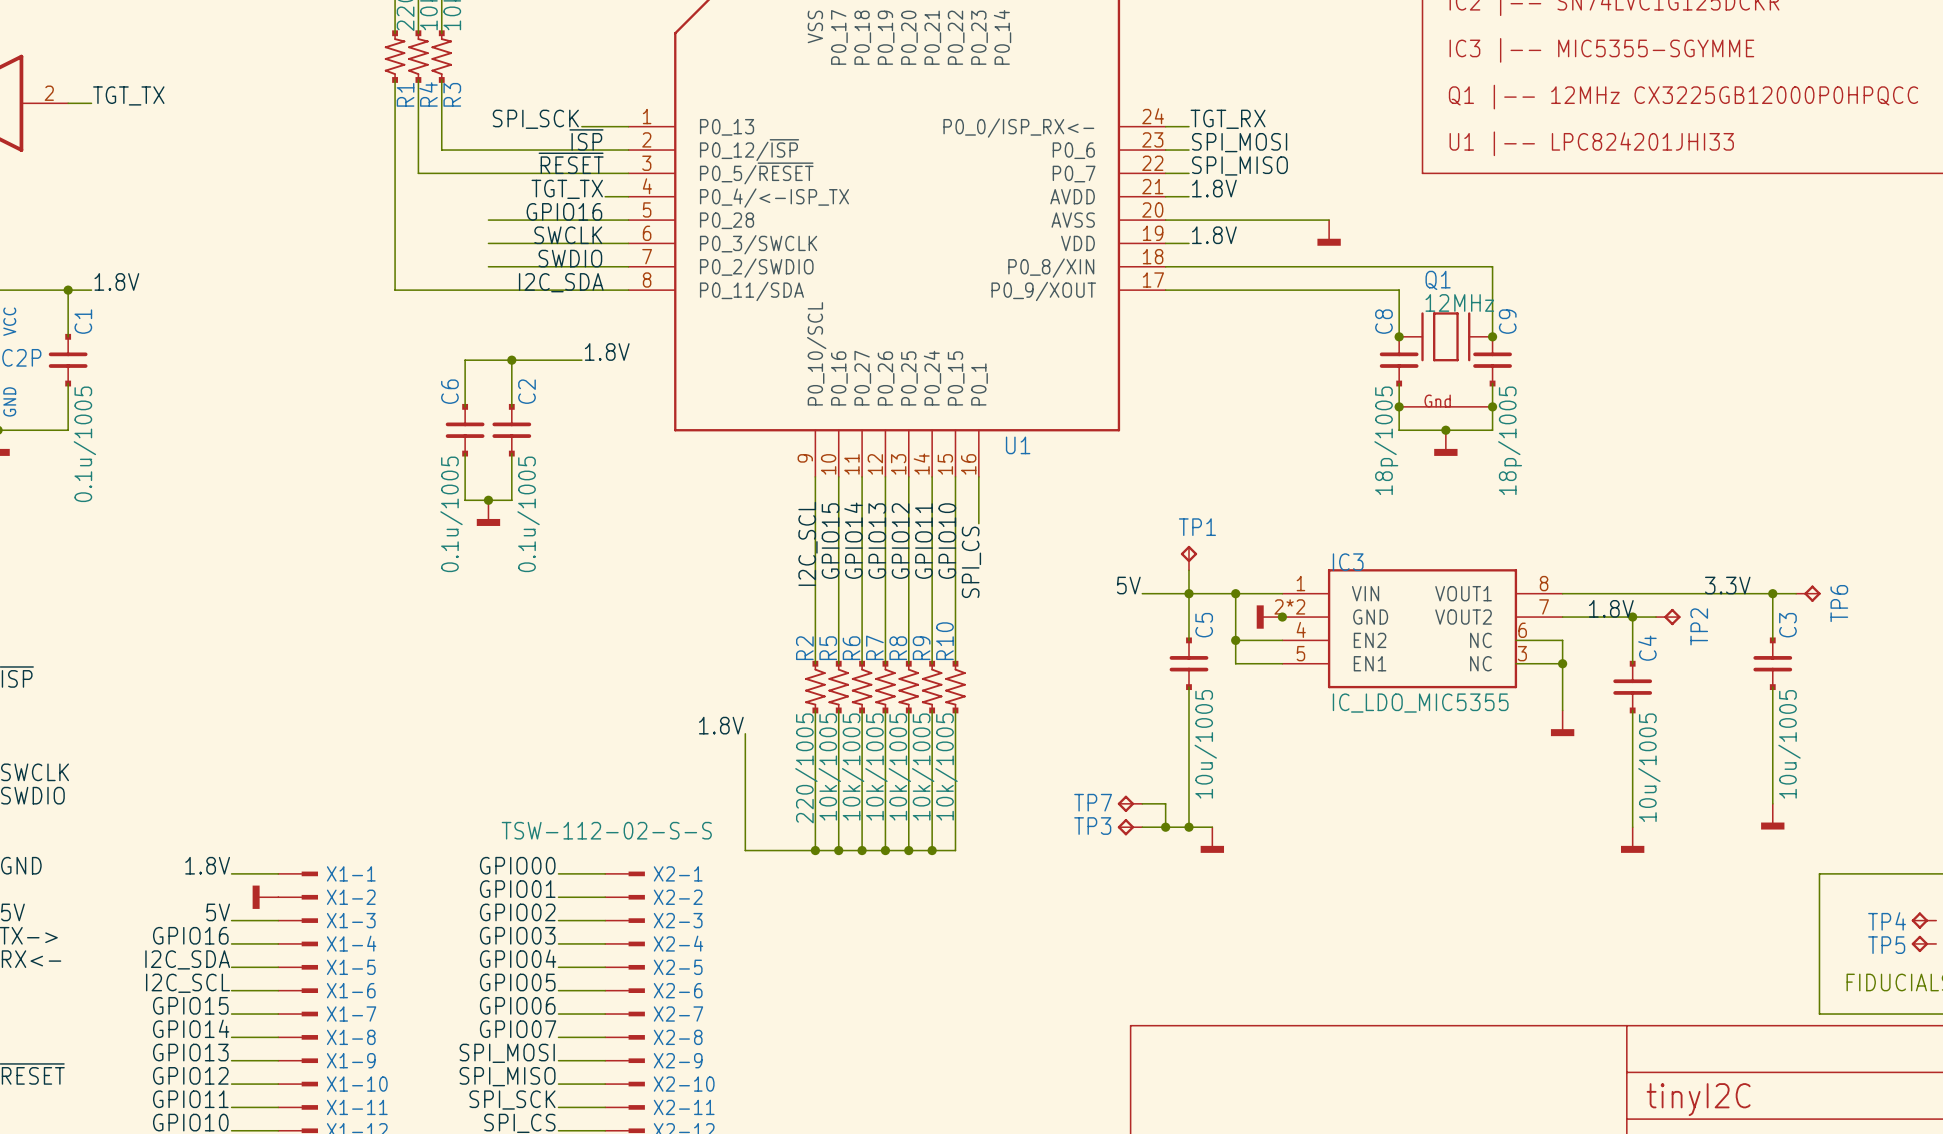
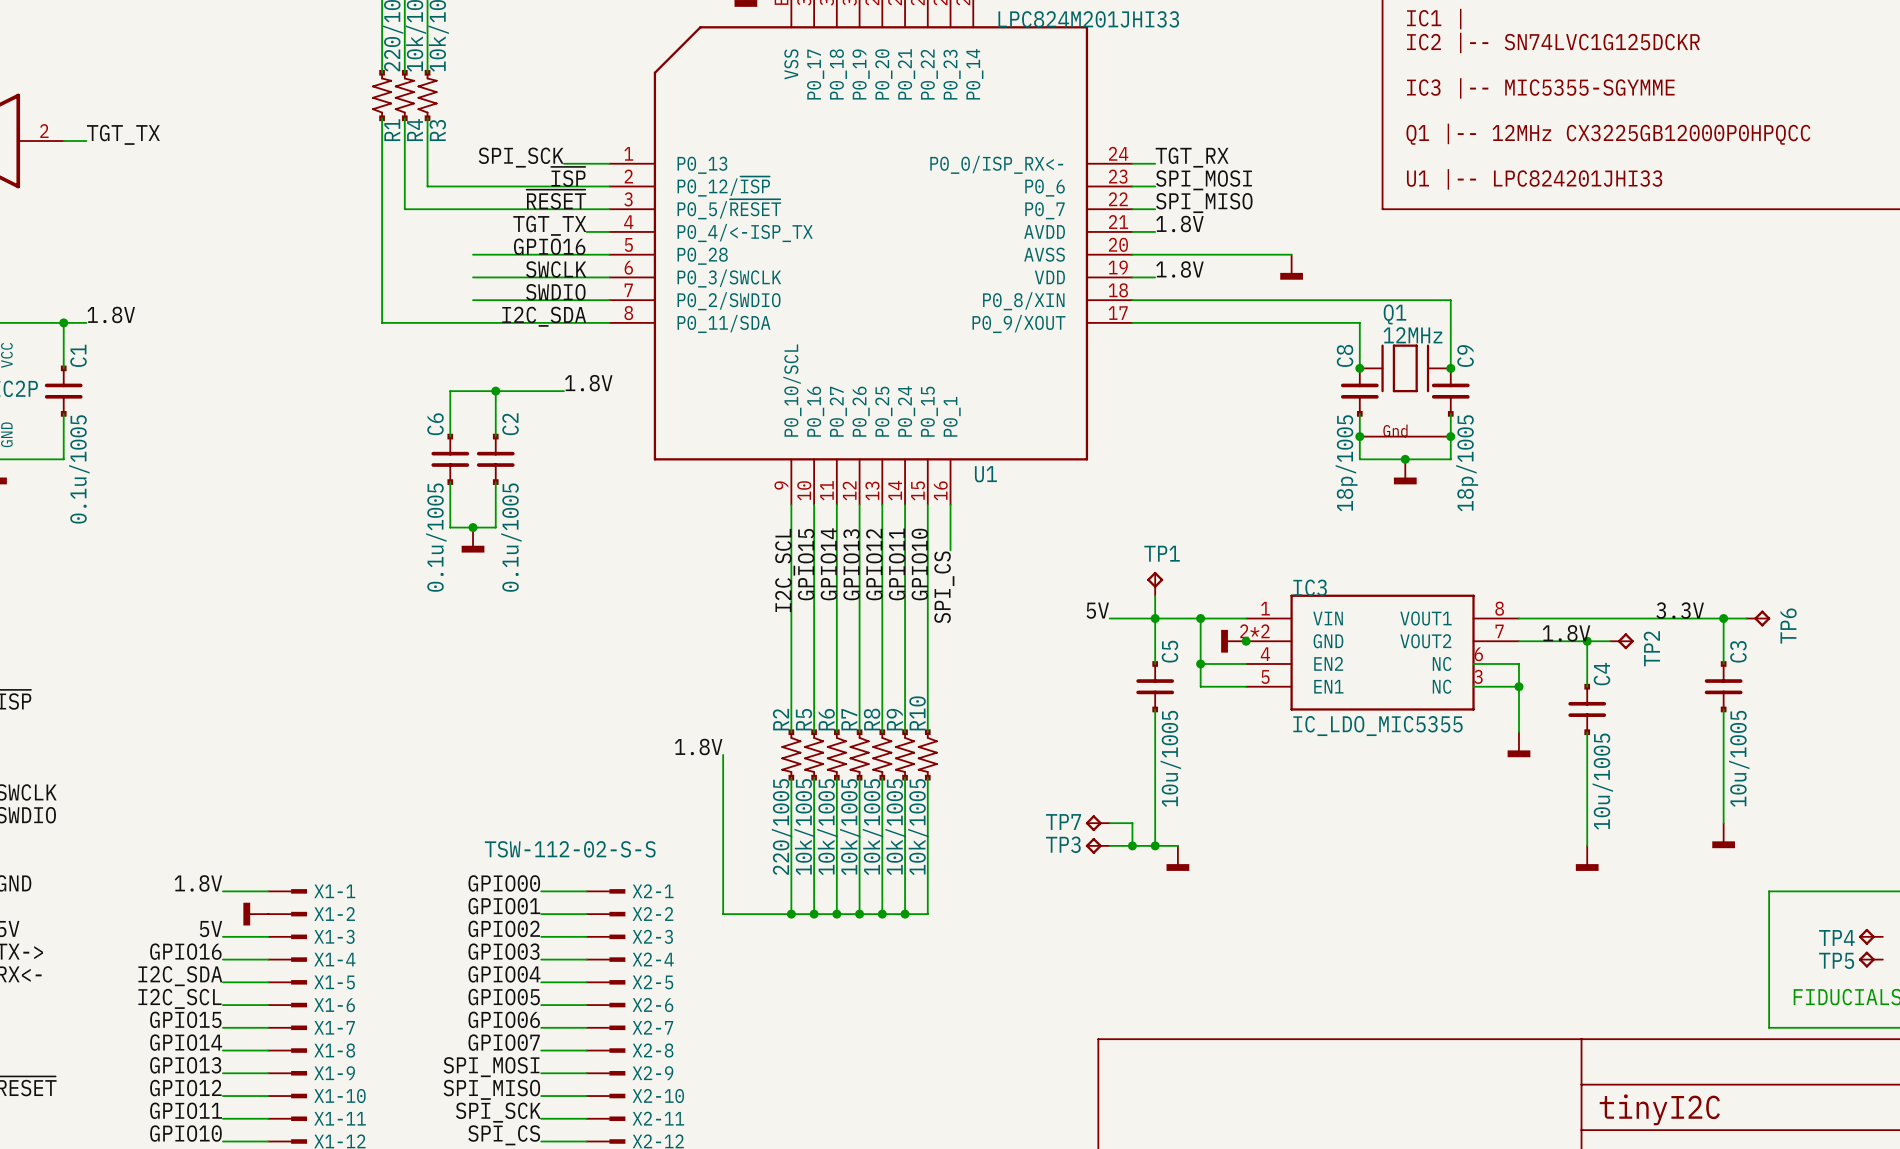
R2 symbol: [805, 660, 826, 714] -> [781, 729, 802, 781]
R5 symbol: [828, 660, 850, 714] -> [804, 729, 825, 781]
R6 symbol: [851, 660, 873, 714] -> [826, 729, 847, 781]
R7 symbol: [875, 660, 896, 714] -> [849, 729, 870, 781]
R8 symbol: [898, 660, 920, 714] -> [872, 729, 893, 781]
R9 symbol: [921, 660, 943, 714] -> [895, 729, 916, 781]
R10 symbol: [945, 660, 966, 714] -> [917, 729, 938, 781]
wire: (745, 850) (955, 850) -> (723, 868) (723, 914) (927, 914) (927, 868)
wire: none -> (791, 868) (791, 914)
junction: (815, 850) -> none
wire: none -> (814, 868) (814, 914)
junction: (838, 850) -> none
wire: none -> (836, 868) (836, 914)
junction: (862, 850) -> none
wire: none -> (859, 868) (859, 914)
junction: (885, 850) -> none
wire: none -> (882, 868) (882, 914)
junction: (908, 850) -> none
wire: none -> (905, 868) (905, 914)
junction: (932, 850) -> none
junction: none -> (791, 914)
junction: none -> (814, 914)
junction: none -> (836, 914)
junction: none -> (859, 914)
junction: none -> (882, 914)
junction: none -> (905, 914)

